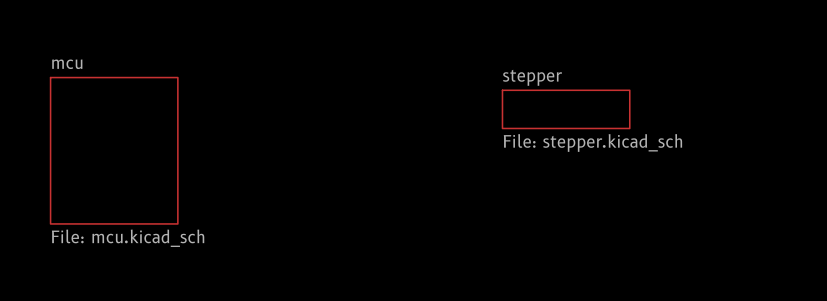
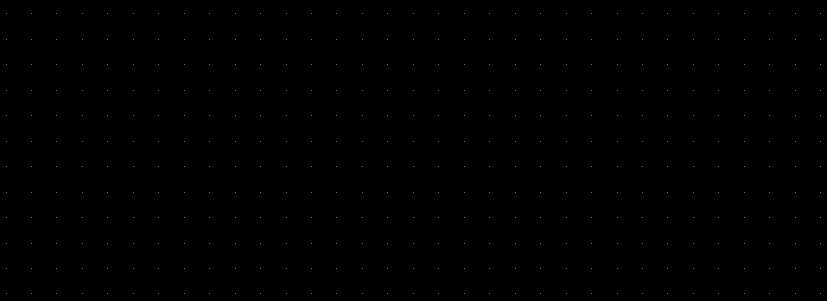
sheet stepper: File: stepper.kicad_sch (566, 109) -> none
sheet mcu: File: mcu.kicad_sch (114, 150) -> none

